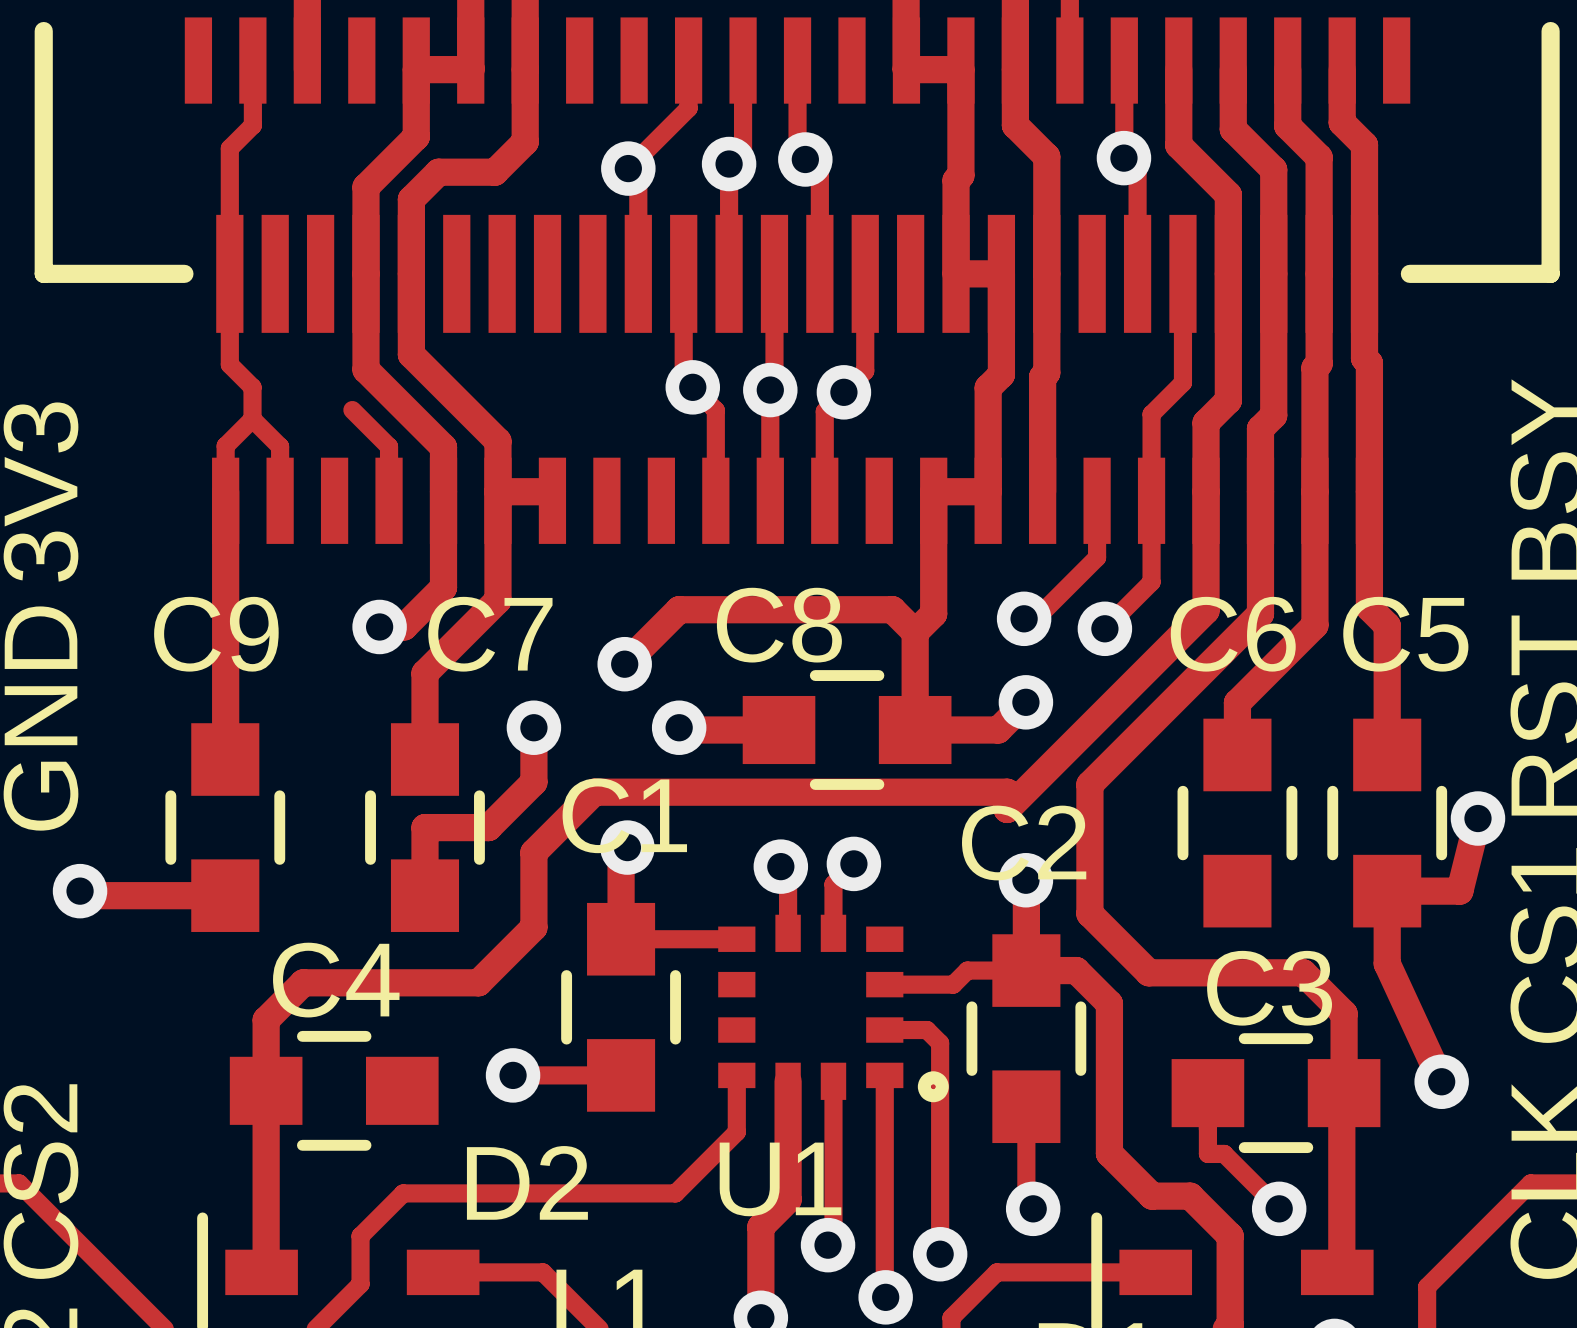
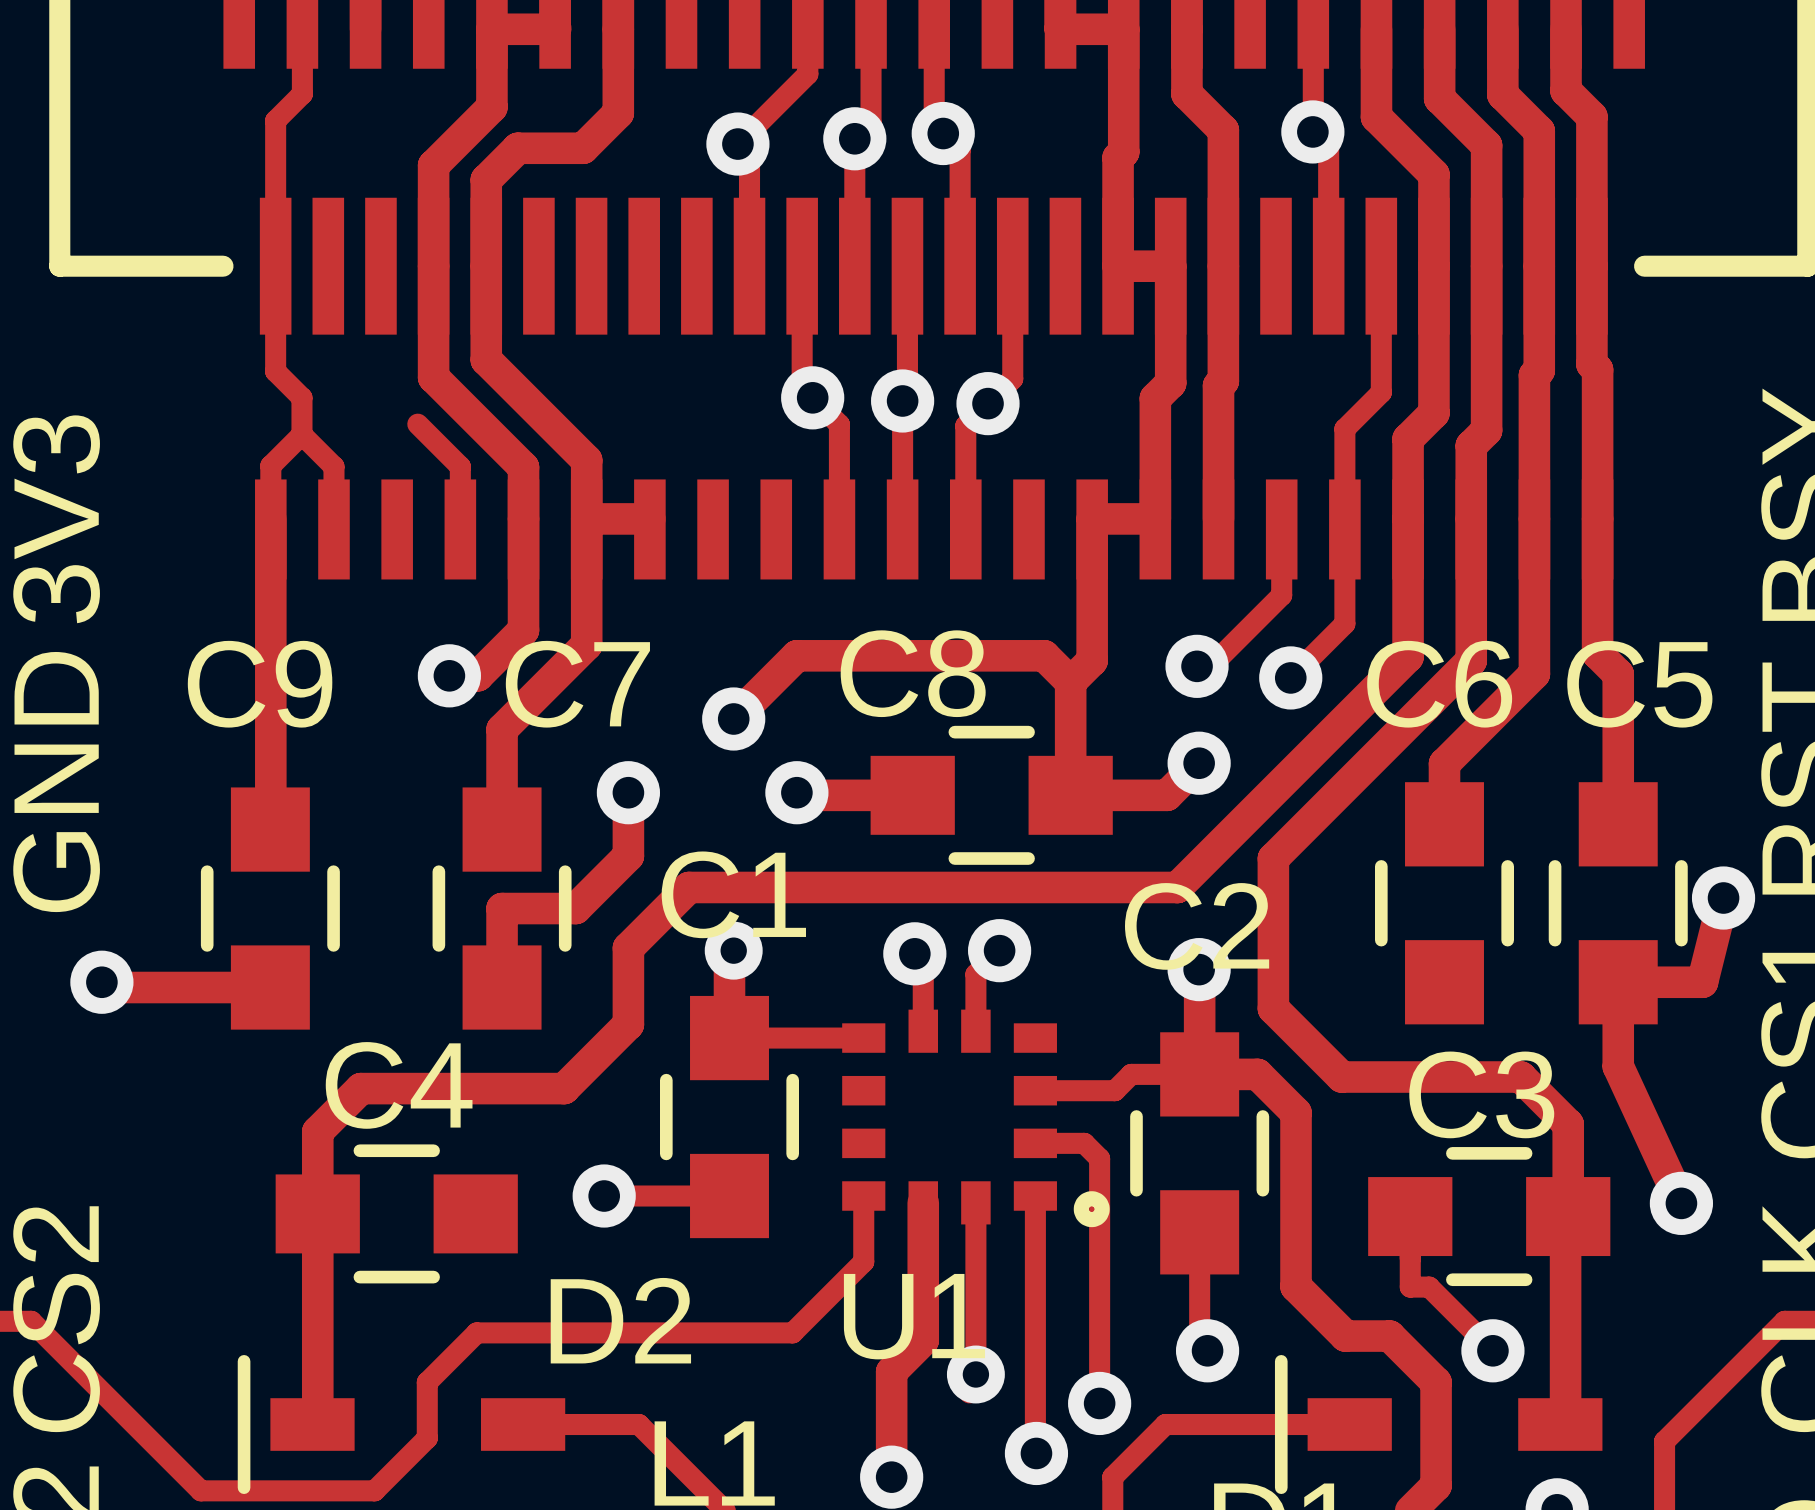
track: (1007, 809) (1007, 792) (594, 792) (533, 852) (533, 861) -> (1177, 887) (688, 887) (628, 948)
via position: (627, 847) -> (733, 950)
via position: (828, 1245) -> (975, 1374)

